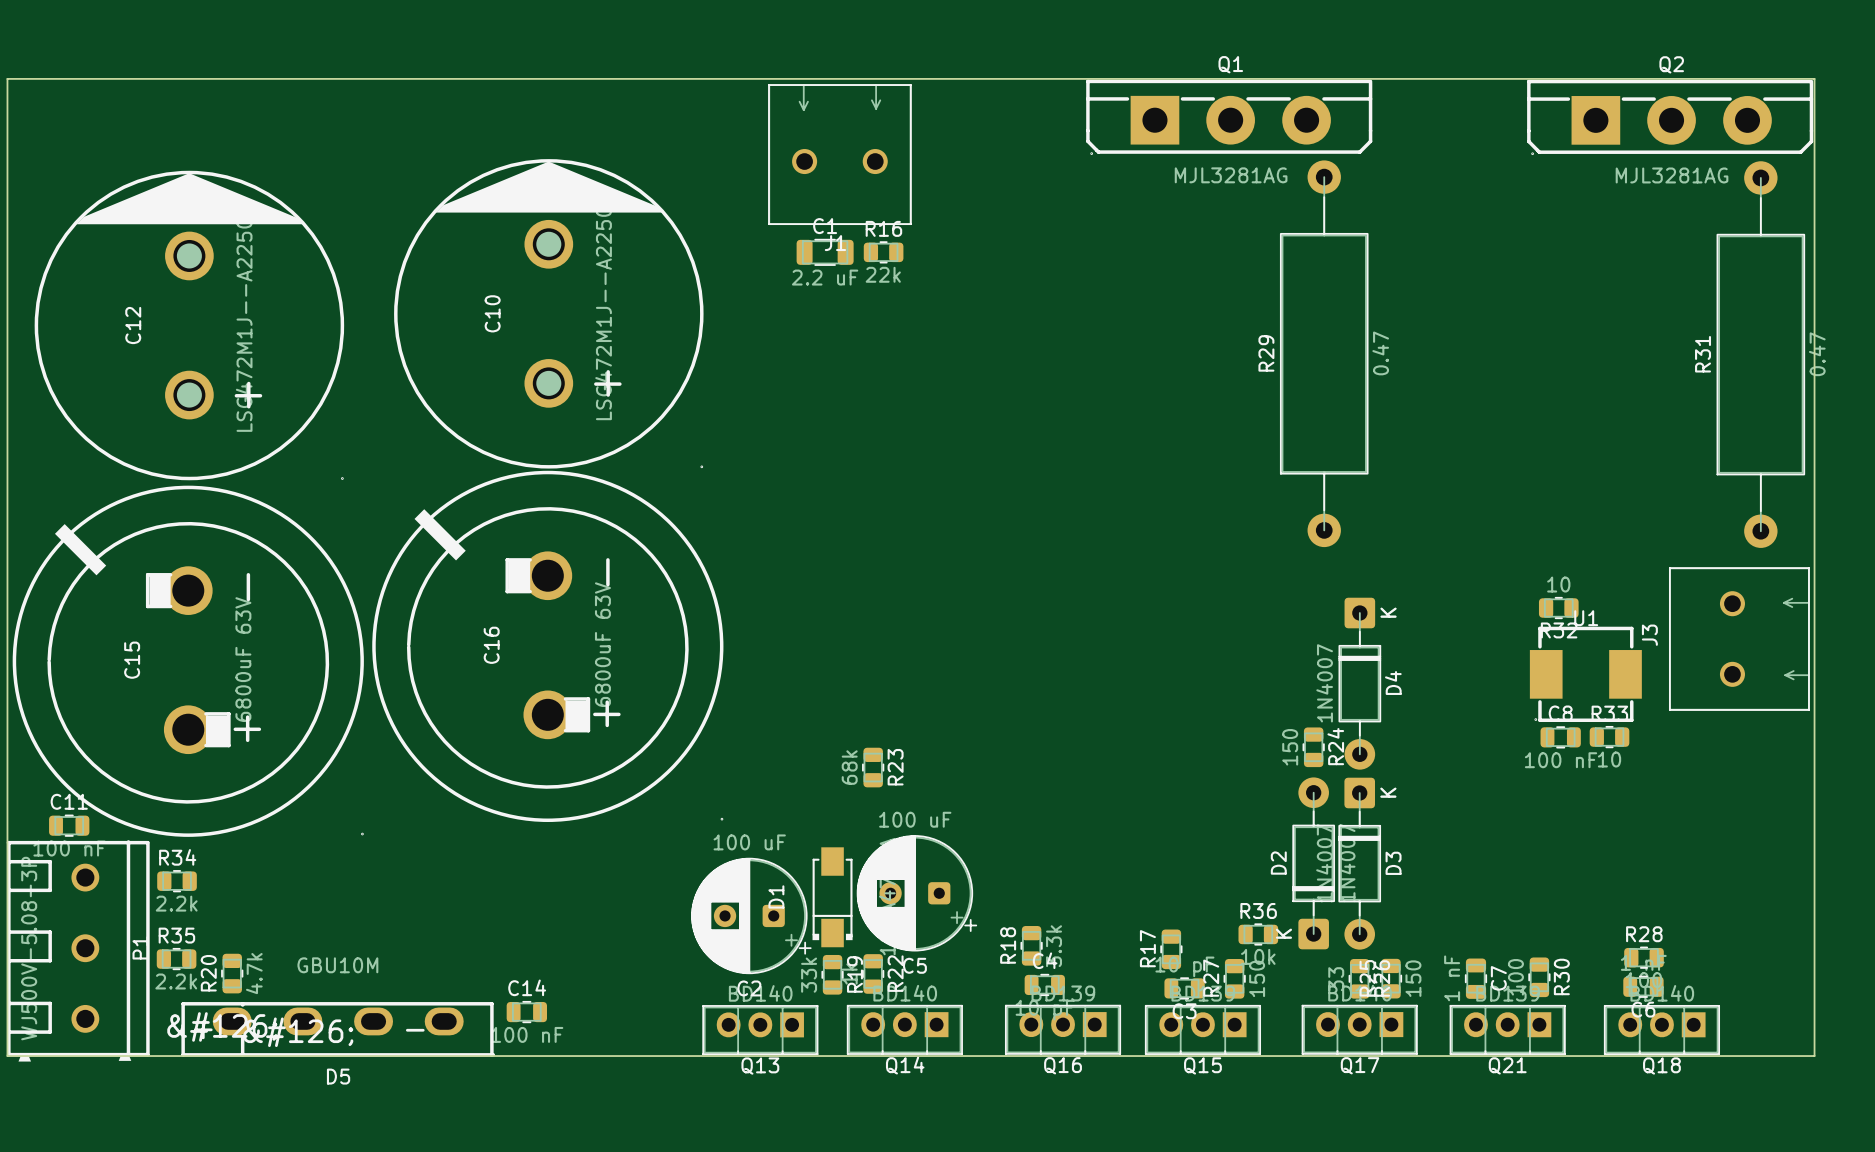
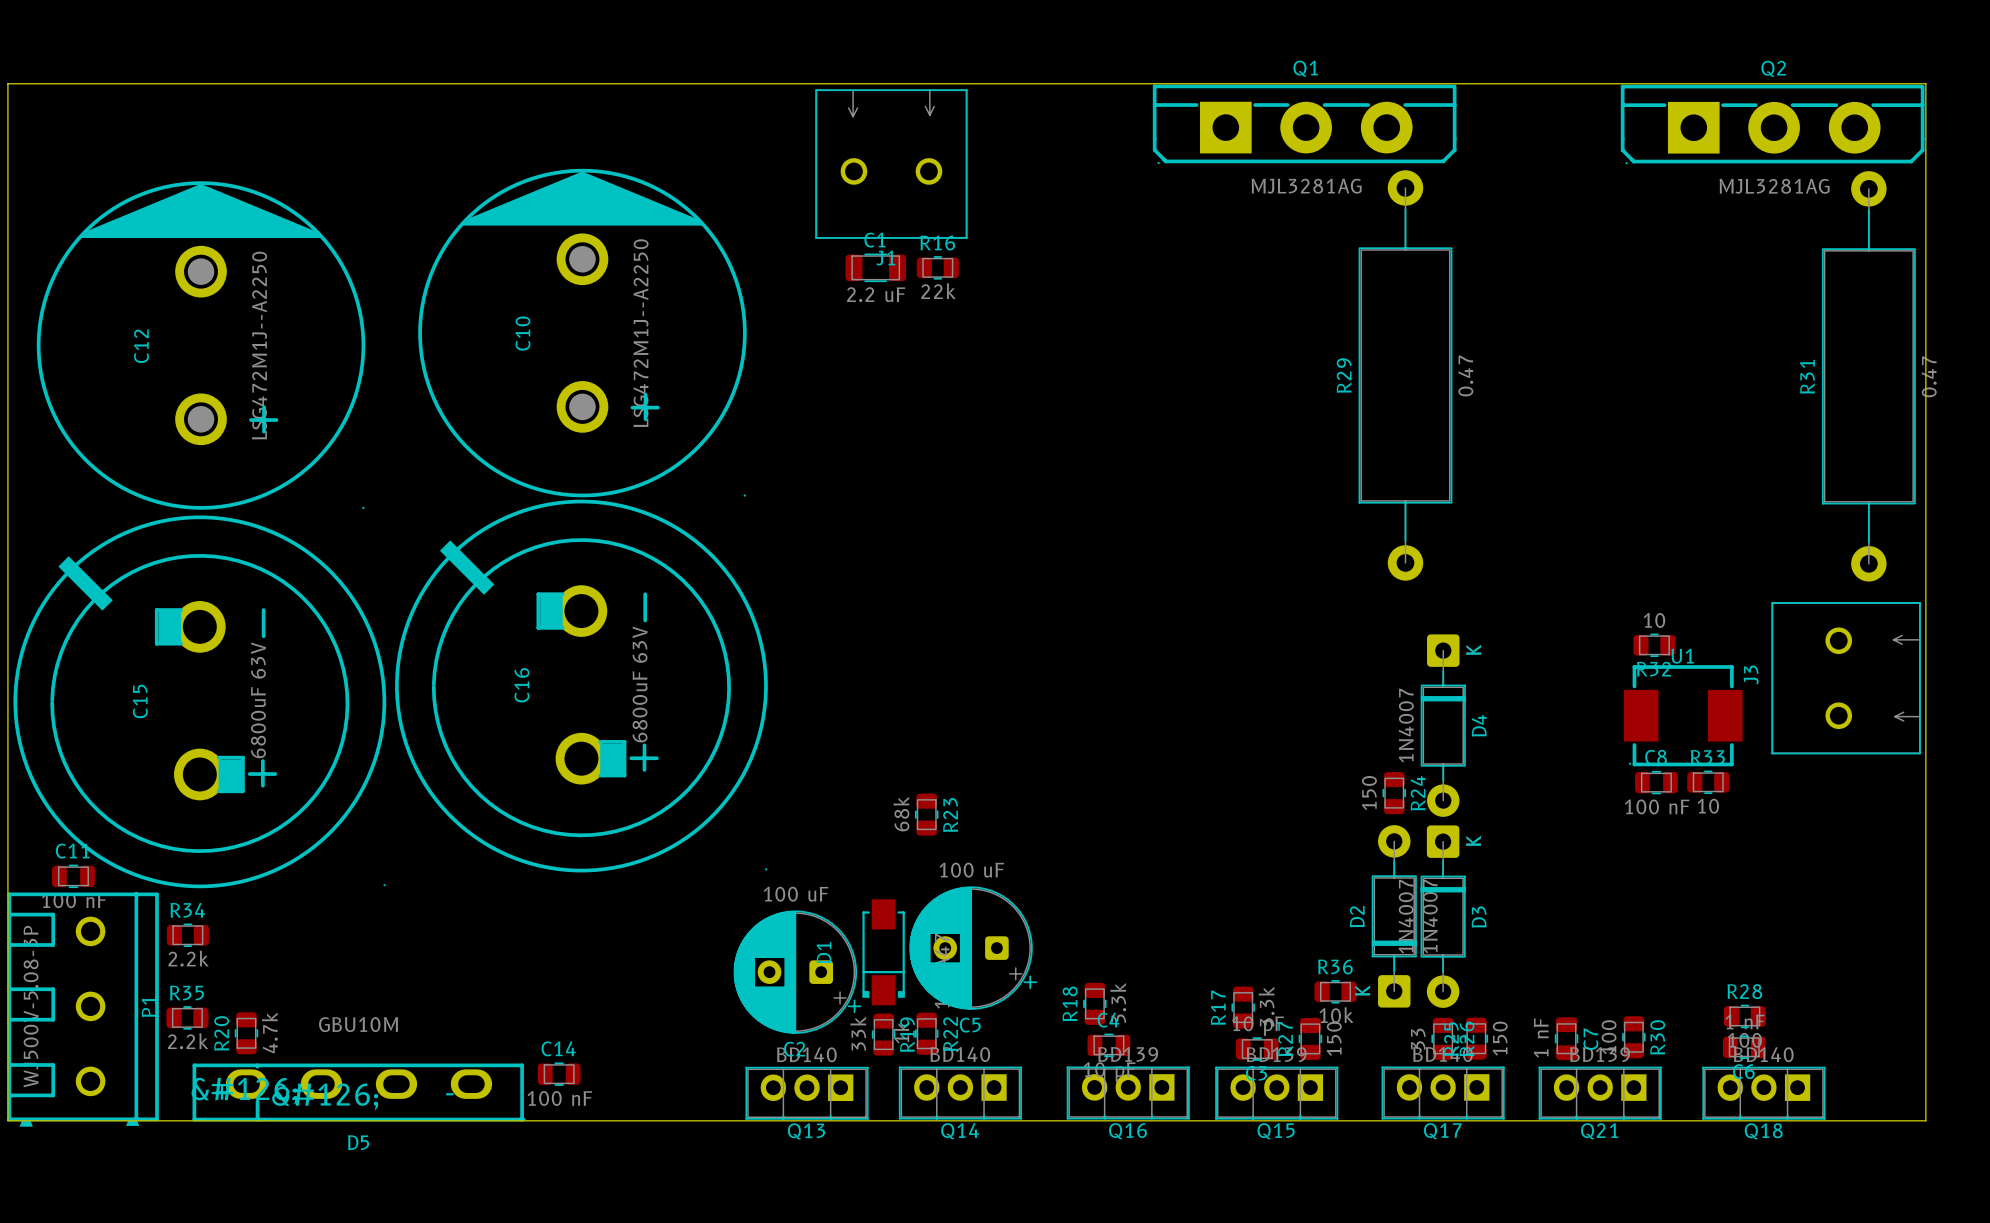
R17 value: none -> 3.3k (1266, 1006)

